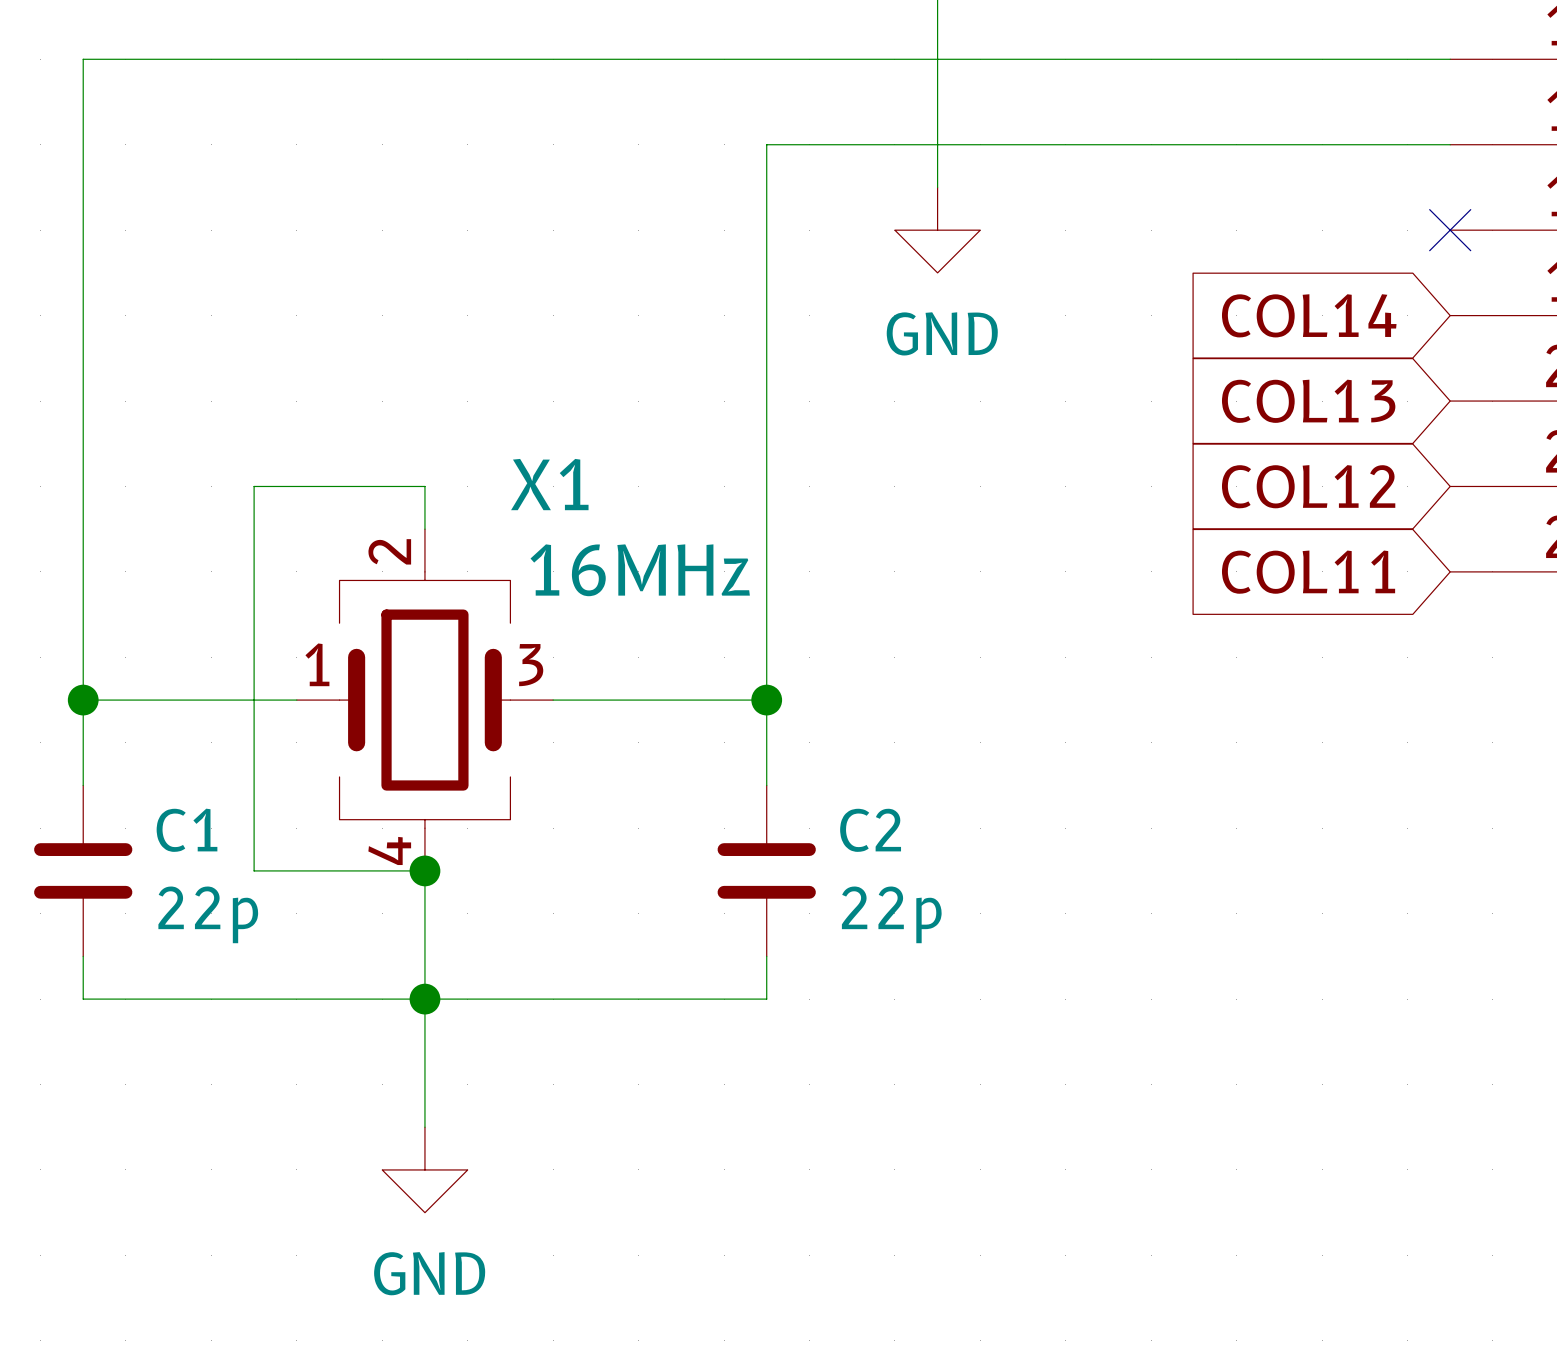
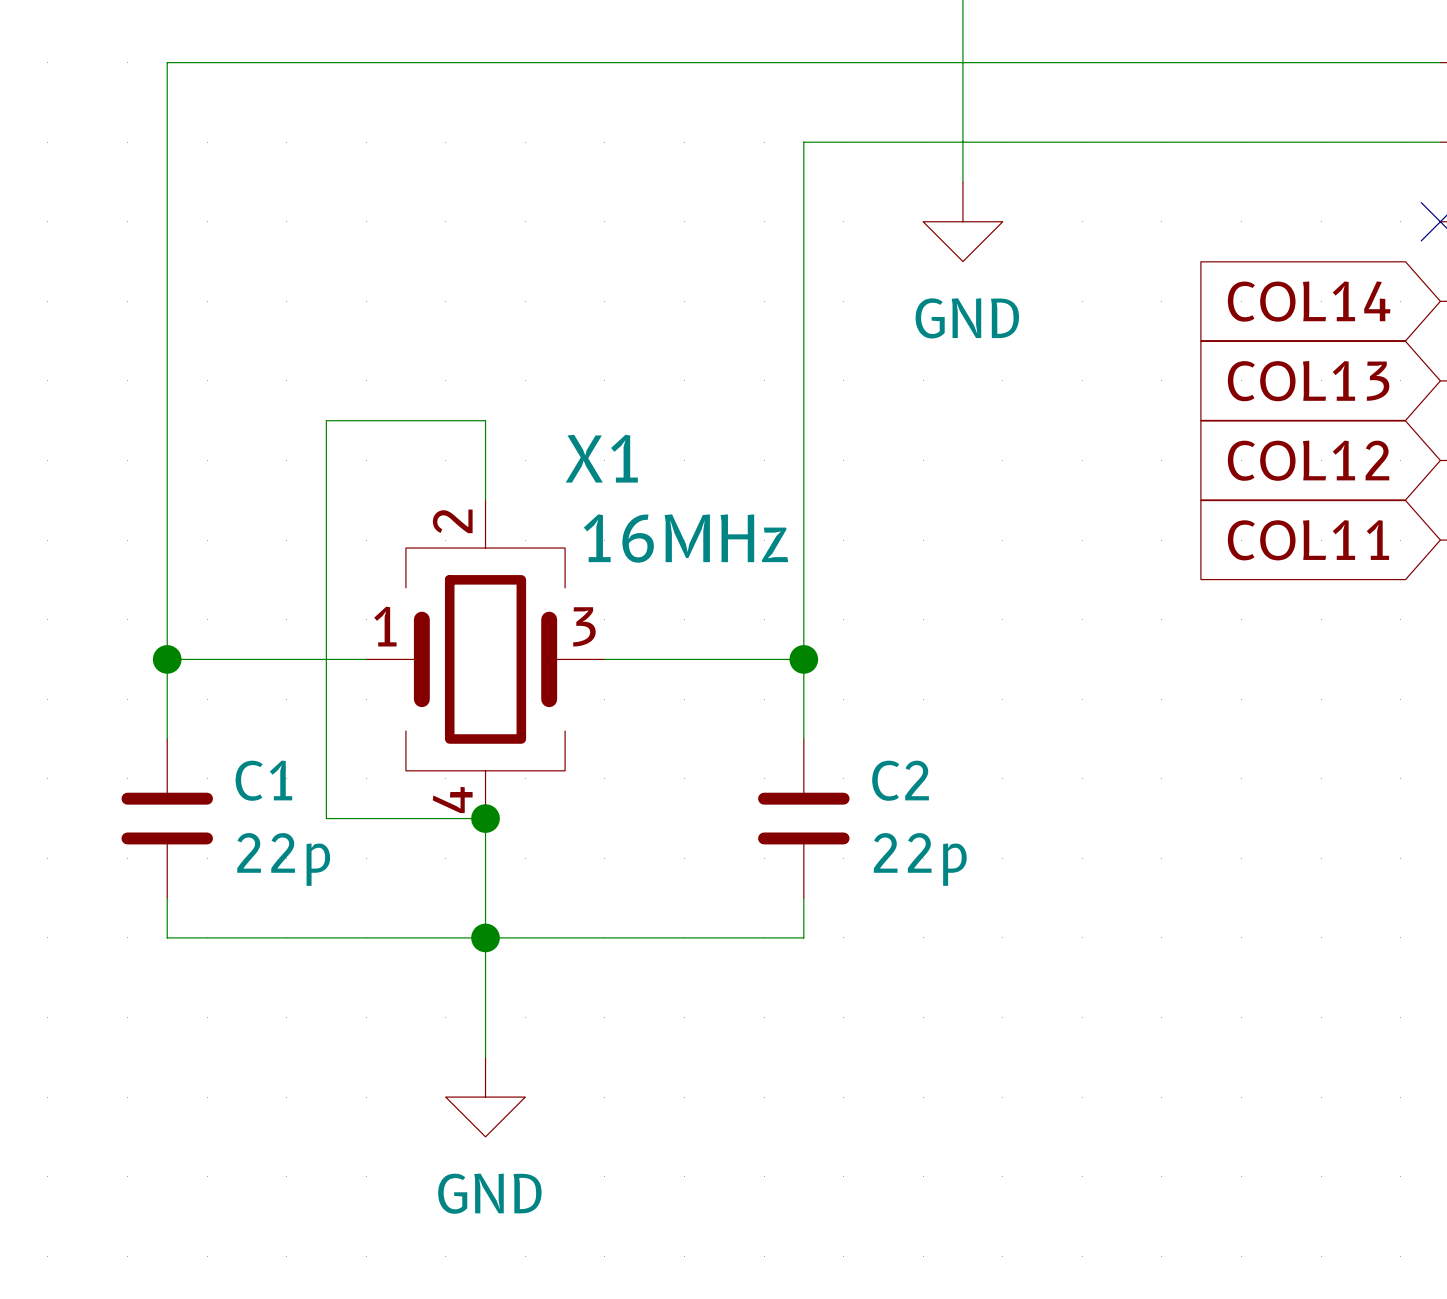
wire: (254, 486) (424, 486) -> (326, 460) (326, 420) (485, 420) (485, 460)

